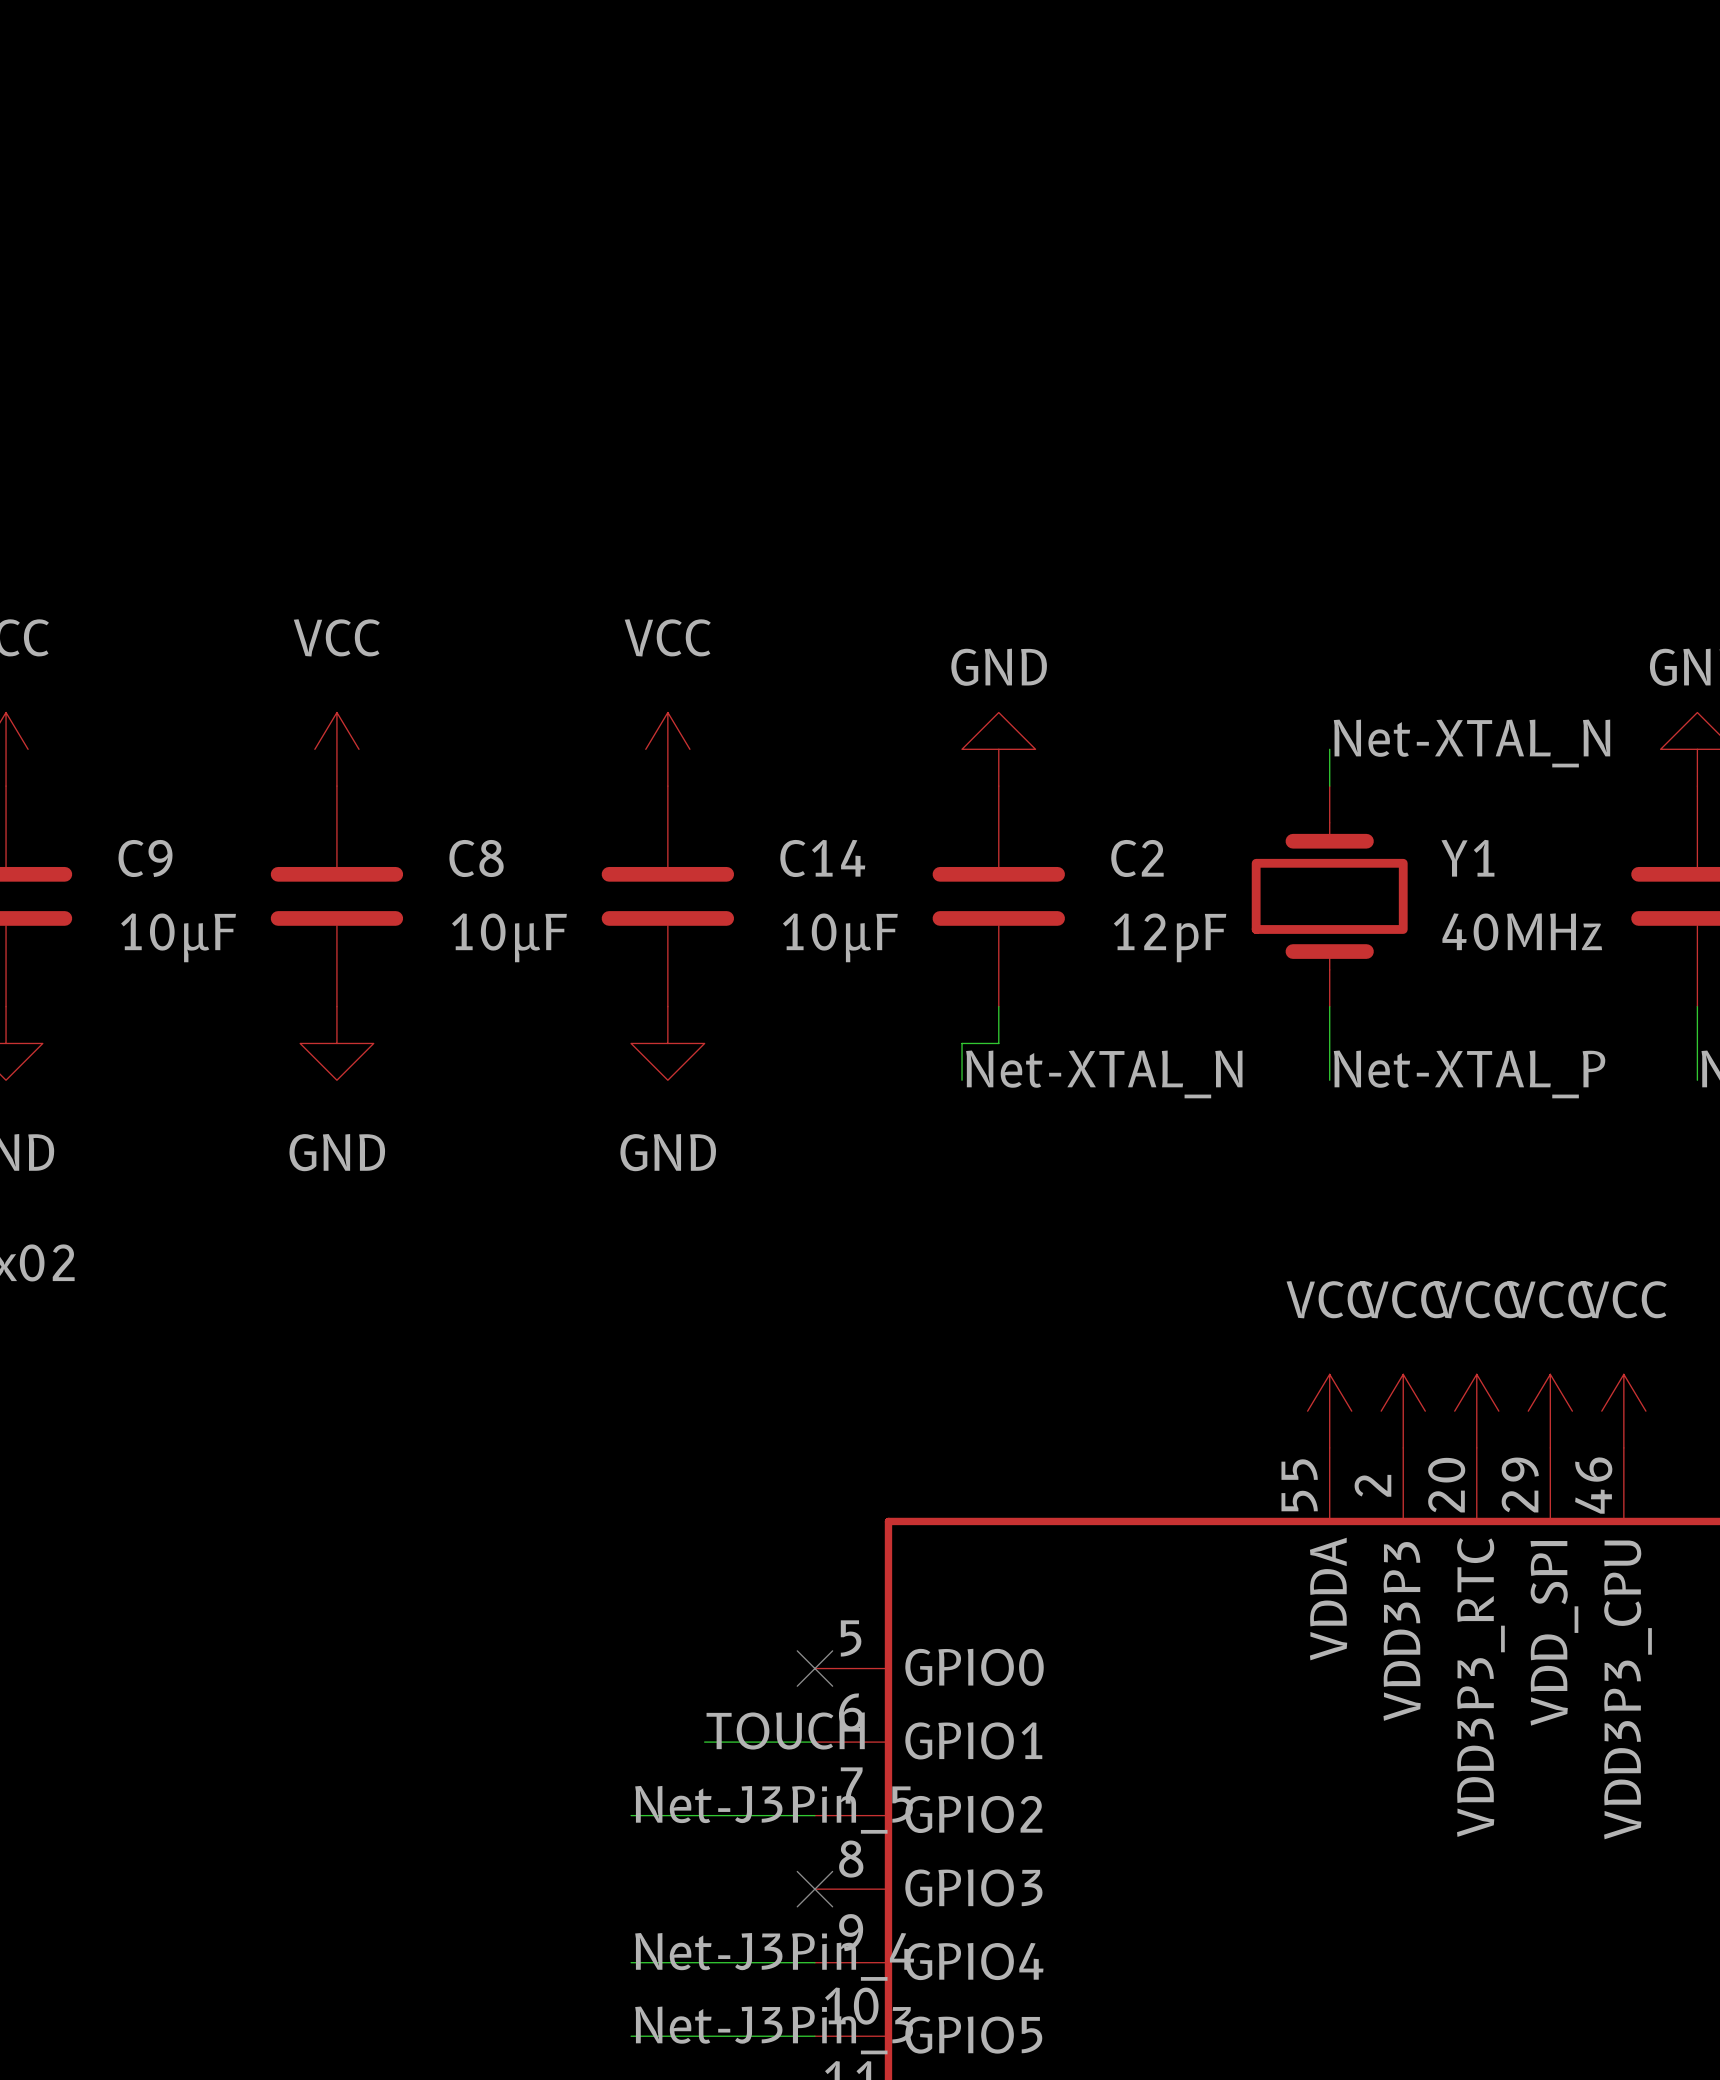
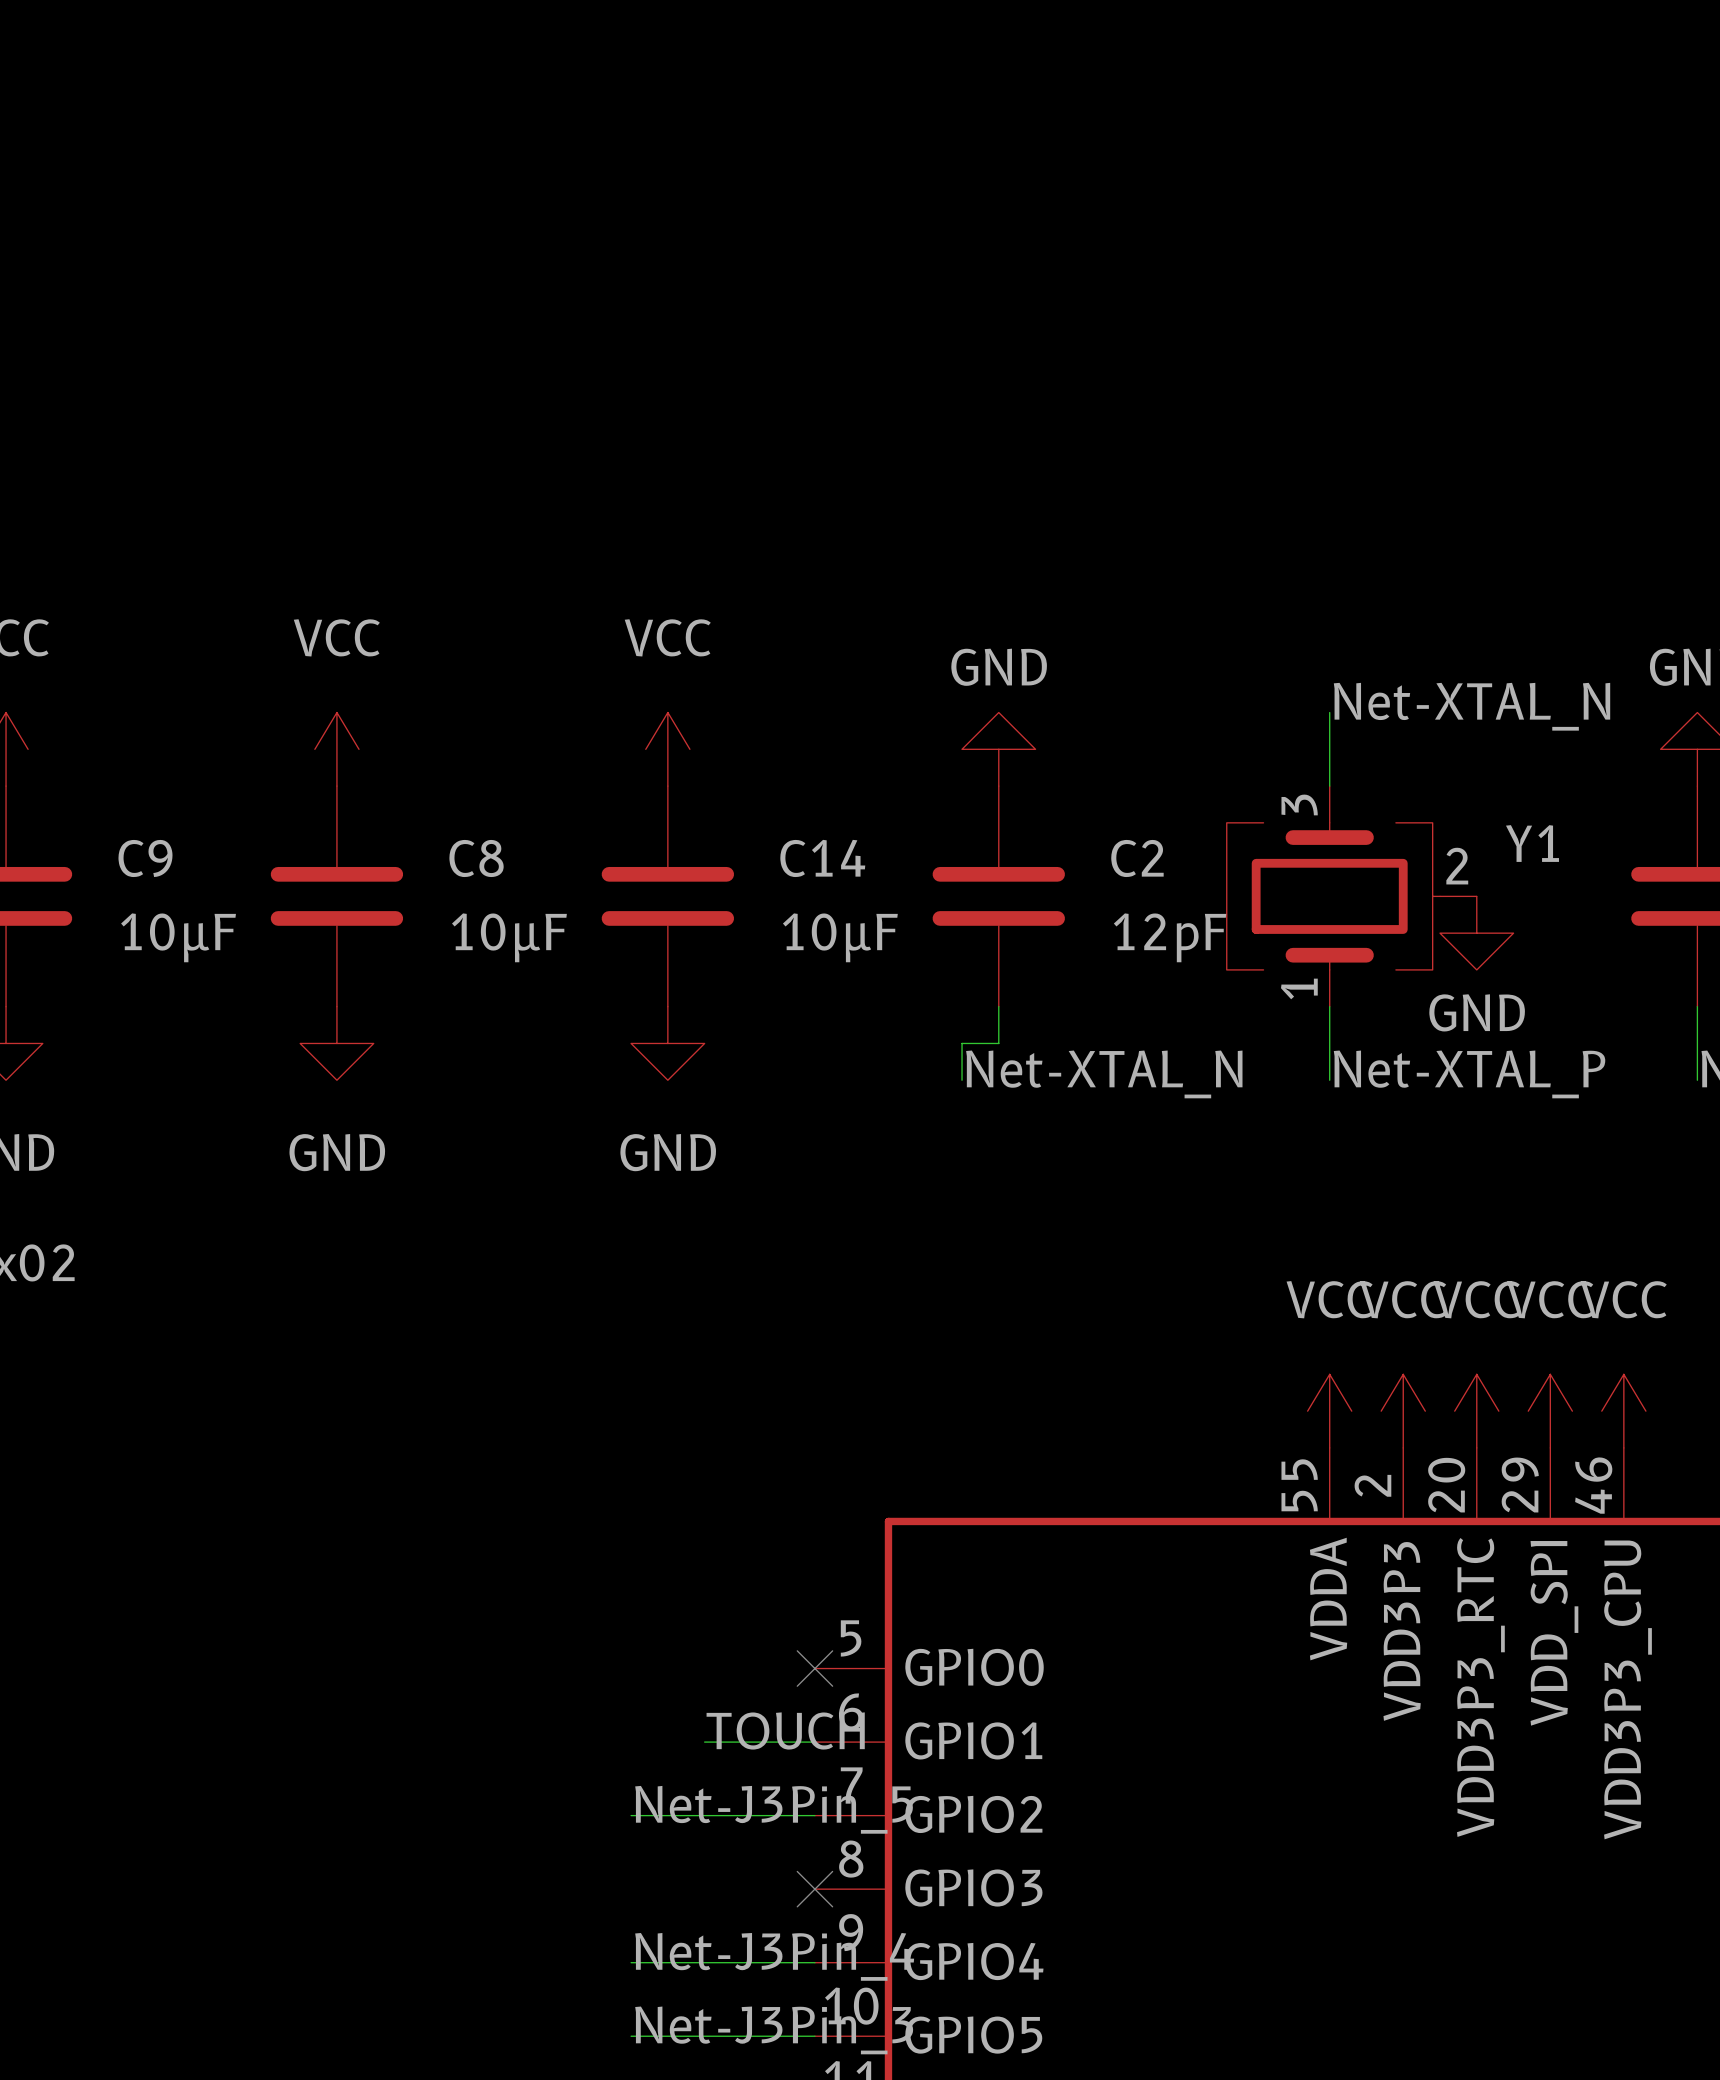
wire: none -> (1329, 712) (1329, 749)
label position: Net-XTAL_N (1472, 743) -> Net-XTAL_N (1472, 706)
Y1 symbol: [1251, 786, 1408, 1007] -> [1226, 786, 1477, 1007]
Y1 value: 40MHz (1522, 931) -> none
power symbol: none -> GND (1476, 933)

